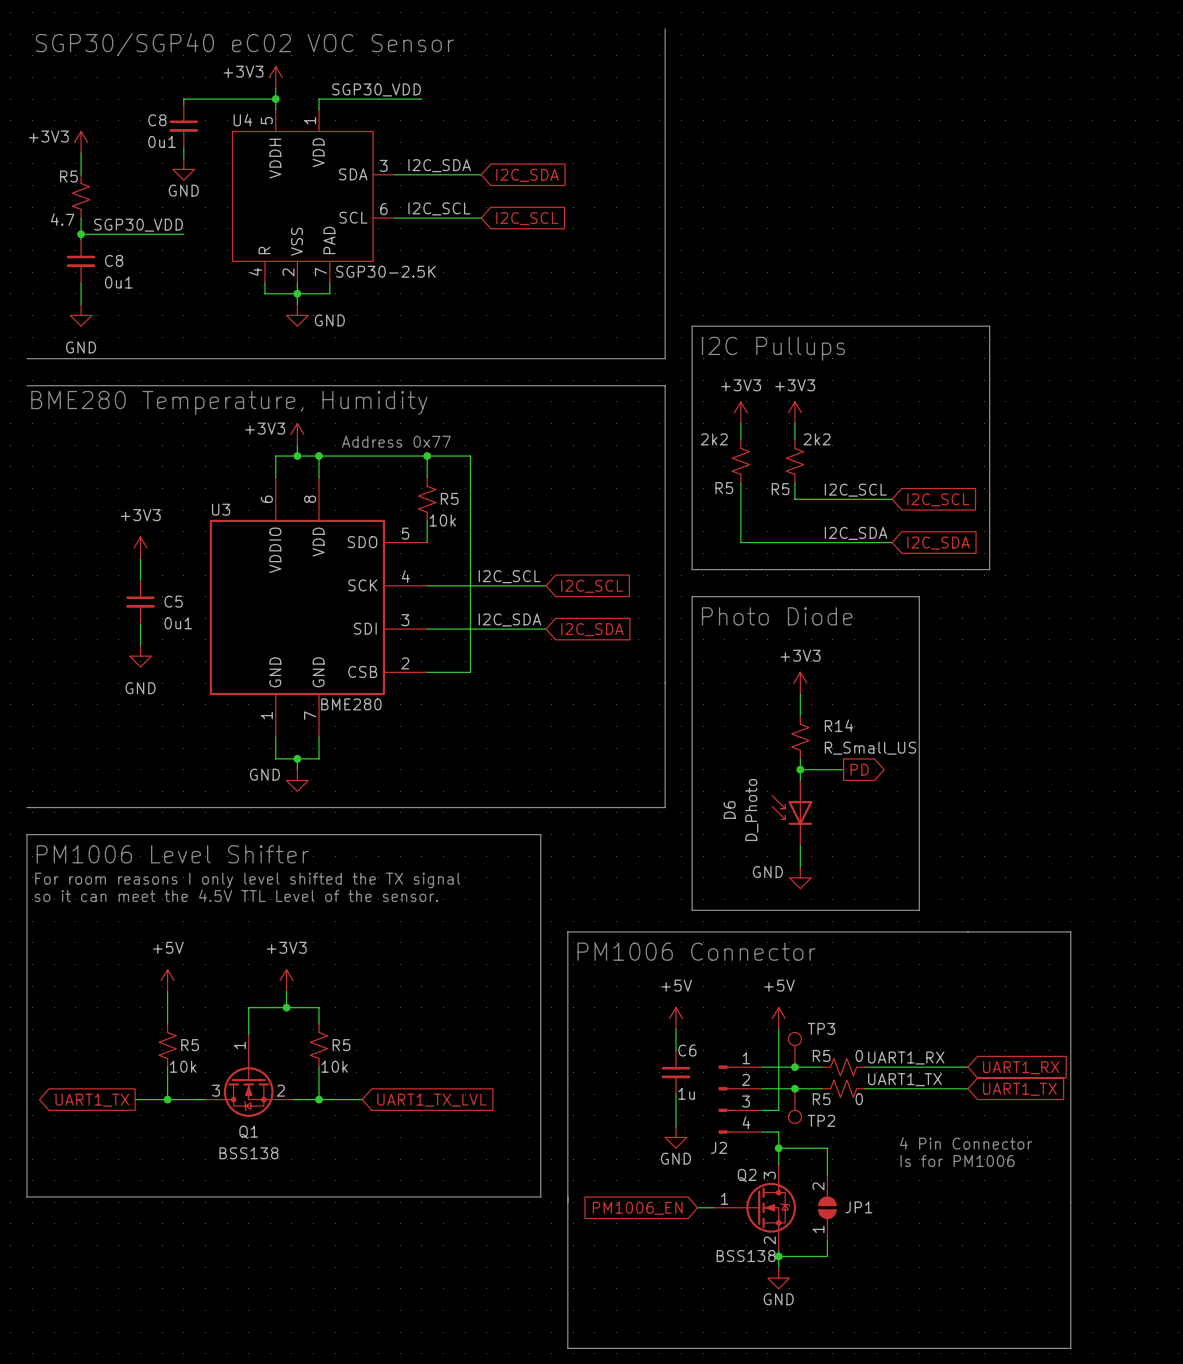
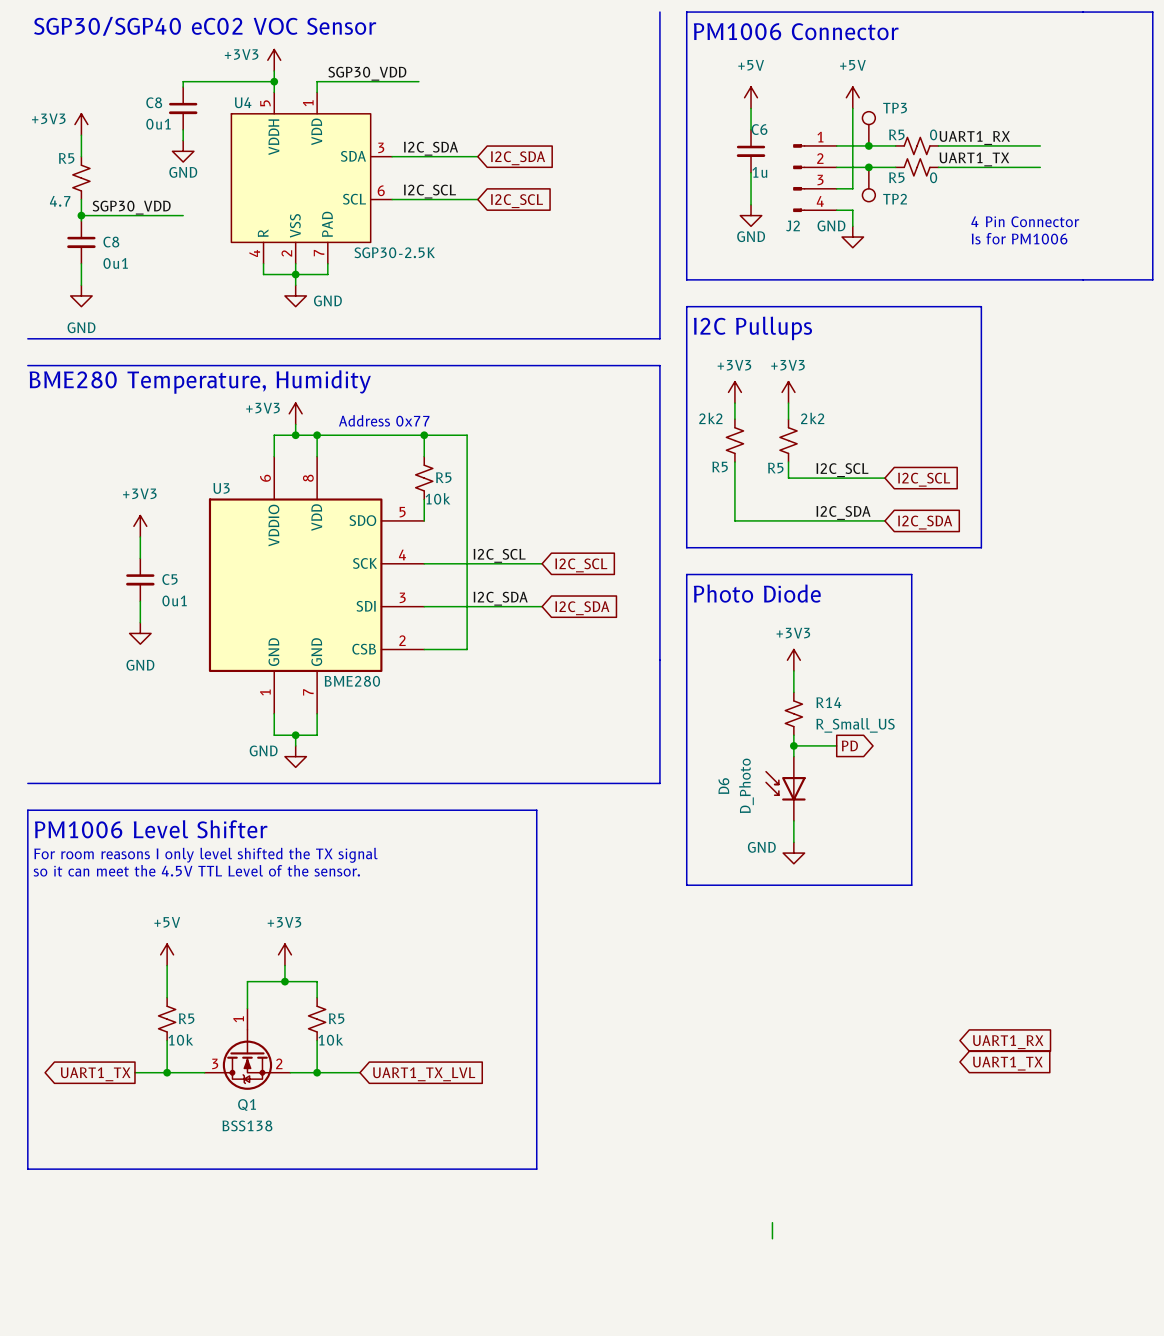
line: none -> (686, 12) (686, 279) (1152, 279) (1152, 12) (686, 12)
text: none -> PM1006 Connector (796, 31)
power symbol: none -> +5V (751, 97)
power symbol: none -> +5V (852, 97)
wire: none -> (751, 108) (751, 129)
wire: none -> (852, 108) (852, 188) (836, 188)
label: none -> UART1_RX (974, 138)
wire: none -> (836, 145) (895, 145)
junction: none -> (868, 145)
R5: none -> 0 (917, 145)
wire: none -> (938, 145) (1040, 145)
label: none -> UART1_TX (974, 159)
wire: none -> (836, 167) (895, 167)
junction: none -> (868, 167)
R5: none -> 0 (917, 167)
wire: none -> (938, 167) (1040, 167)
wire: none -> (751, 172) (751, 204)
wire: none -> (836, 210) (852, 210) (852, 226)
power symbol: none -> GND (751, 215)
text: none -> 4 Pin Connector (1025, 221)
power symbol: none -> GND (852, 237)
text: none -> Is for PM1006 (1019, 238)
line: (567, 931) (567, 1348) (1070, 1348) (1070, 931) (567, 931) -> none
text: PM1006 Connector (696, 951) -> none
power symbol: +5V (675, 1018) -> none
power symbol: +5V (778, 1018) -> none
wire: (675, 1029) (675, 1050) -> none
wire: (778, 1029) (778, 1110) (762, 1110) -> none
TP3 position: (794, 1049) -> (868, 128)
label: UART1_RX (906, 1058) -> none
wire: (762, 1067) (821, 1067) -> none
junction: (794, 1067) -> none
R5: 0 (843, 1067) -> none
wire: (865, 1067) (968, 1067) -> none
C6 position: (675, 1072) -> (751, 151)
label: UART1_TX (904, 1079) -> none
wire: (762, 1088) (821, 1088) -> none
junction: (794, 1088) -> none
R5: 0 (843, 1088) -> none
wire: (865, 1088) (968, 1088) -> none
wire: (675, 1094) (675, 1126) -> none
J2 position: (740, 1099) -> (814, 178)
TP2 position: (794, 1106) -> (868, 184)
wire: (762, 1132) (778, 1132) (778, 1164) -> none
power symbol: GND (675, 1137) -> none
text: 4 Pin Connector (966, 1143) -> none
wire: (778, 1148) (827, 1148) (827, 1175) -> none
junction: (778, 1148) -> none
text: Is for PM1006 (957, 1161) -> none
wire: (697, 1207) (713, 1207) -> none
Q2: BSS138 (754, 1207) -> none
JP1: (827, 1207) -> none
global label: PM1006_EN (637, 1208) -> none
wire: (827, 1240) (827, 1256) (778, 1256) -> none
junction: (778, 1256) -> none
power symbol: GND (778, 1278) -> none

